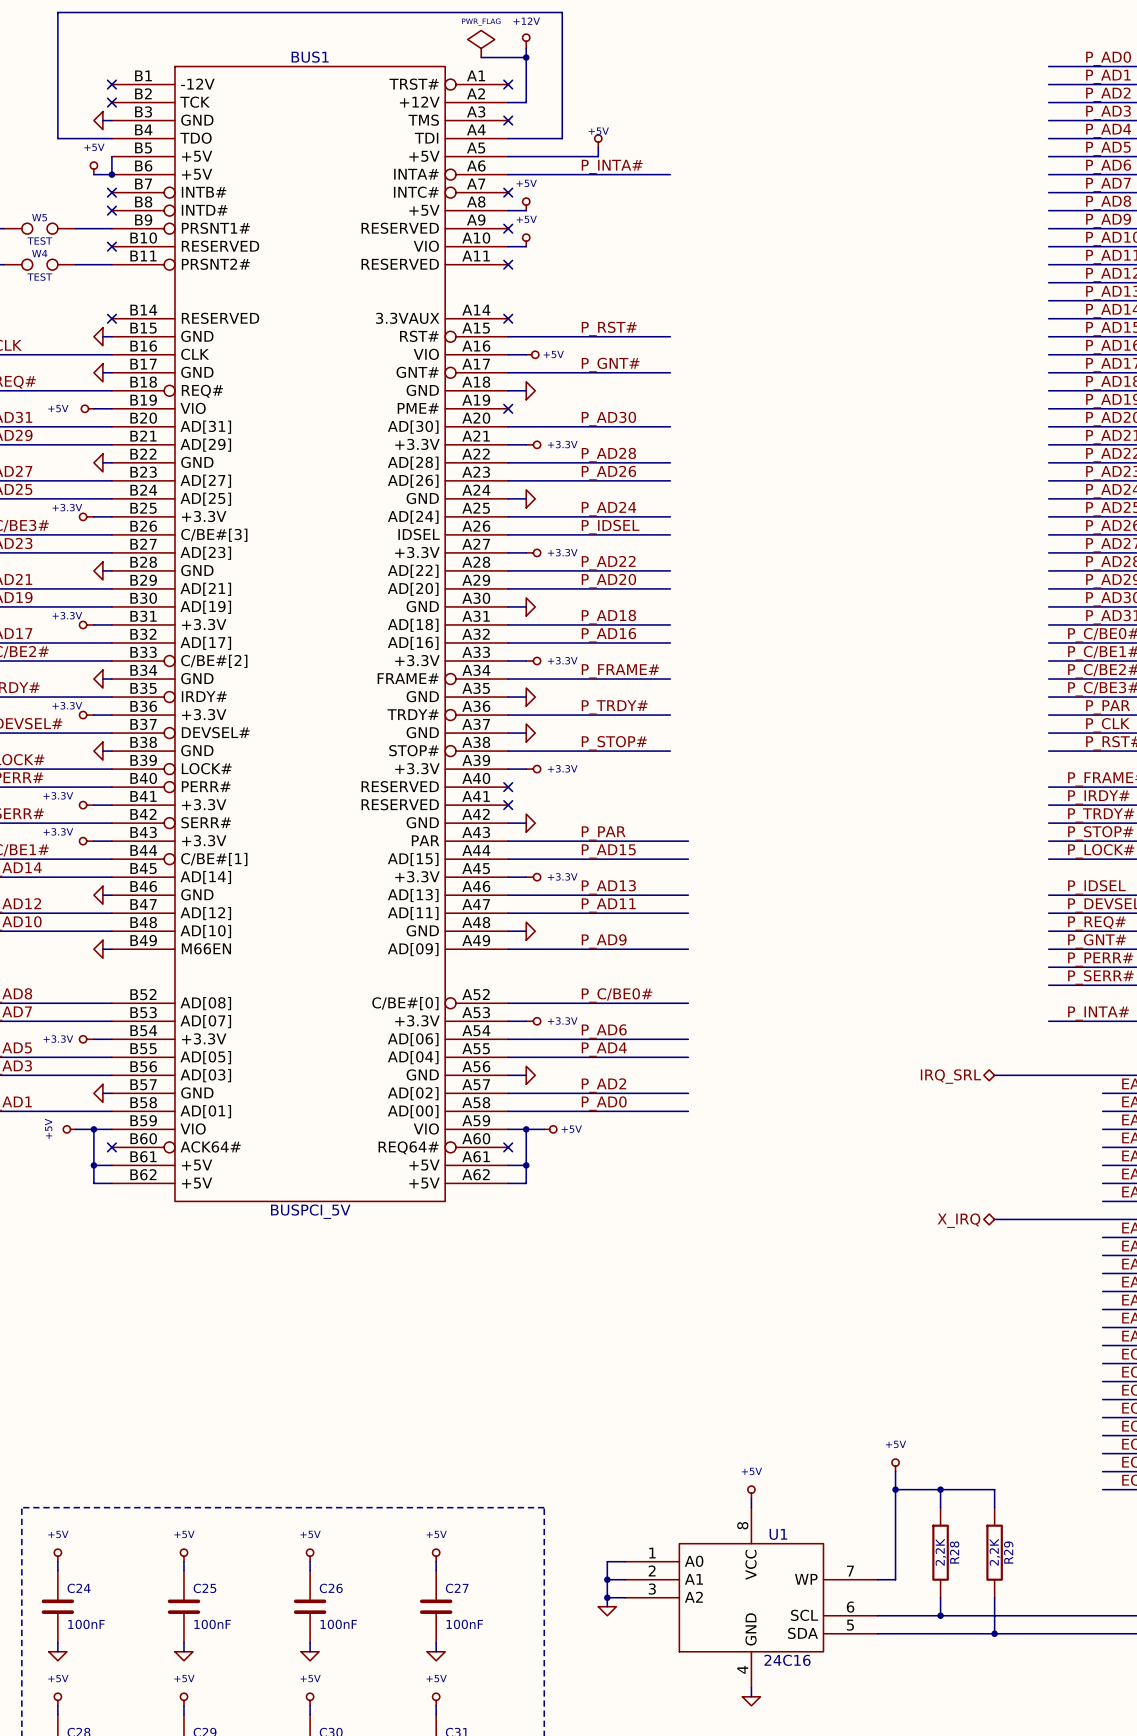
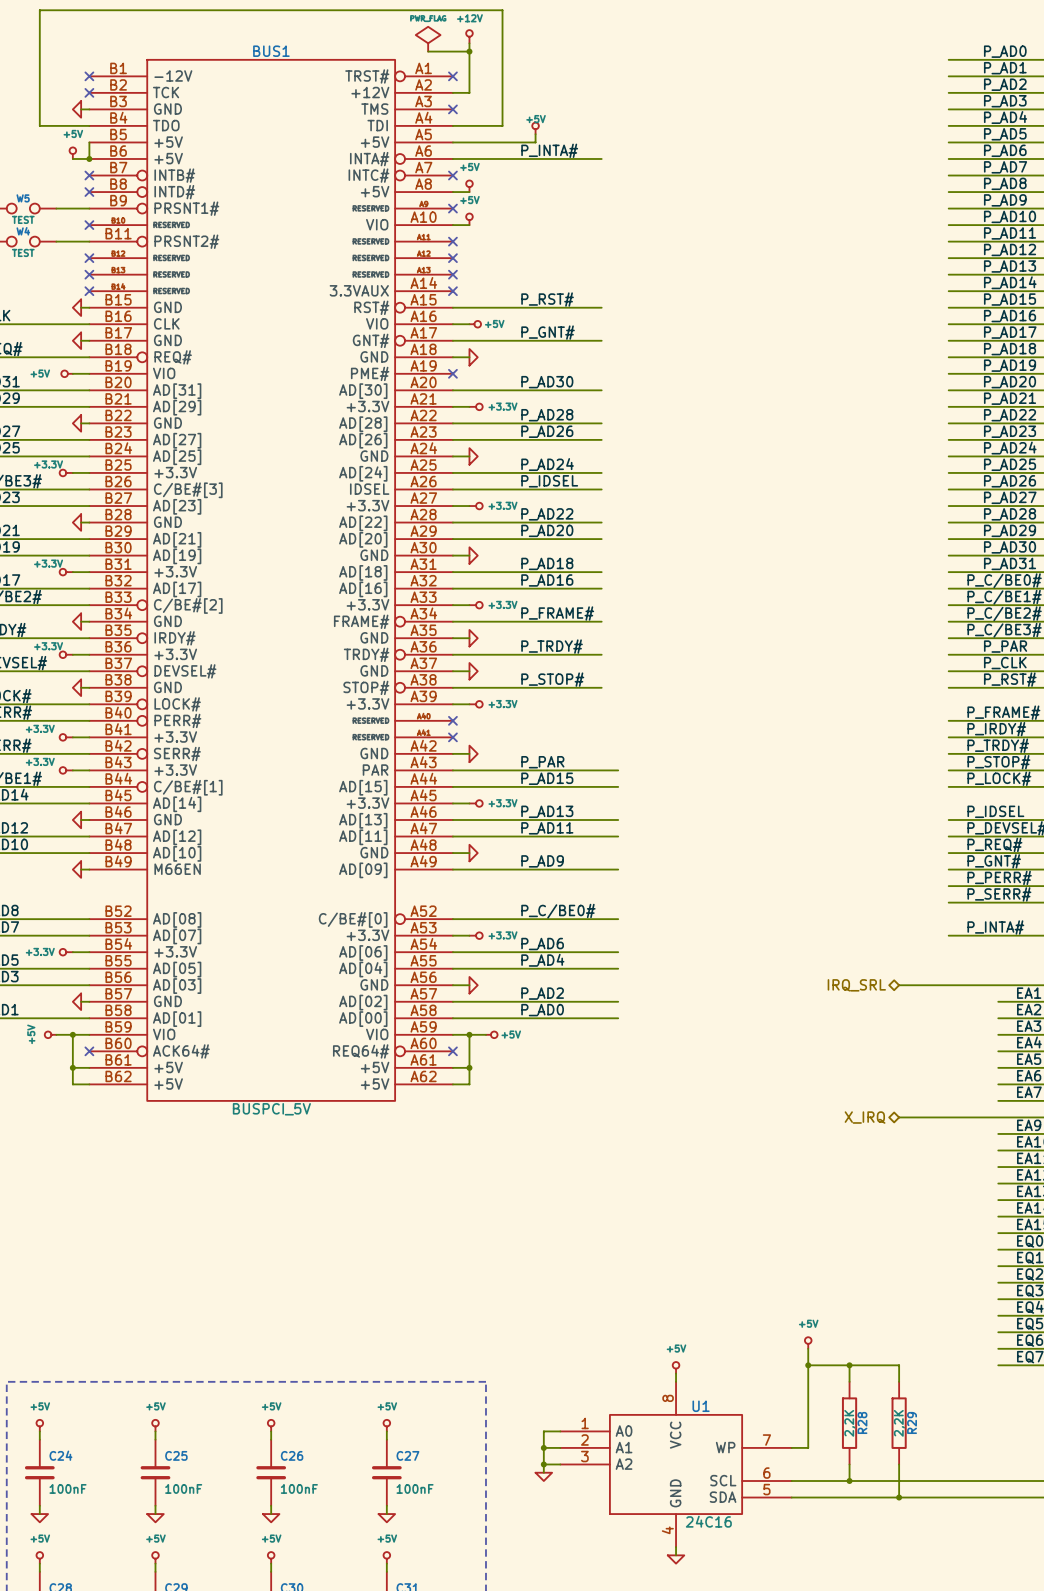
BUS1 symbol: [111, 66, 509, 1202] -> [89, 59, 453, 1101]
no-connect mark: none -> (89, 258)
no-connect mark: none -> (452, 258)
no-connect mark: none -> (89, 274)
no-connect mark: none -> (452, 274)

